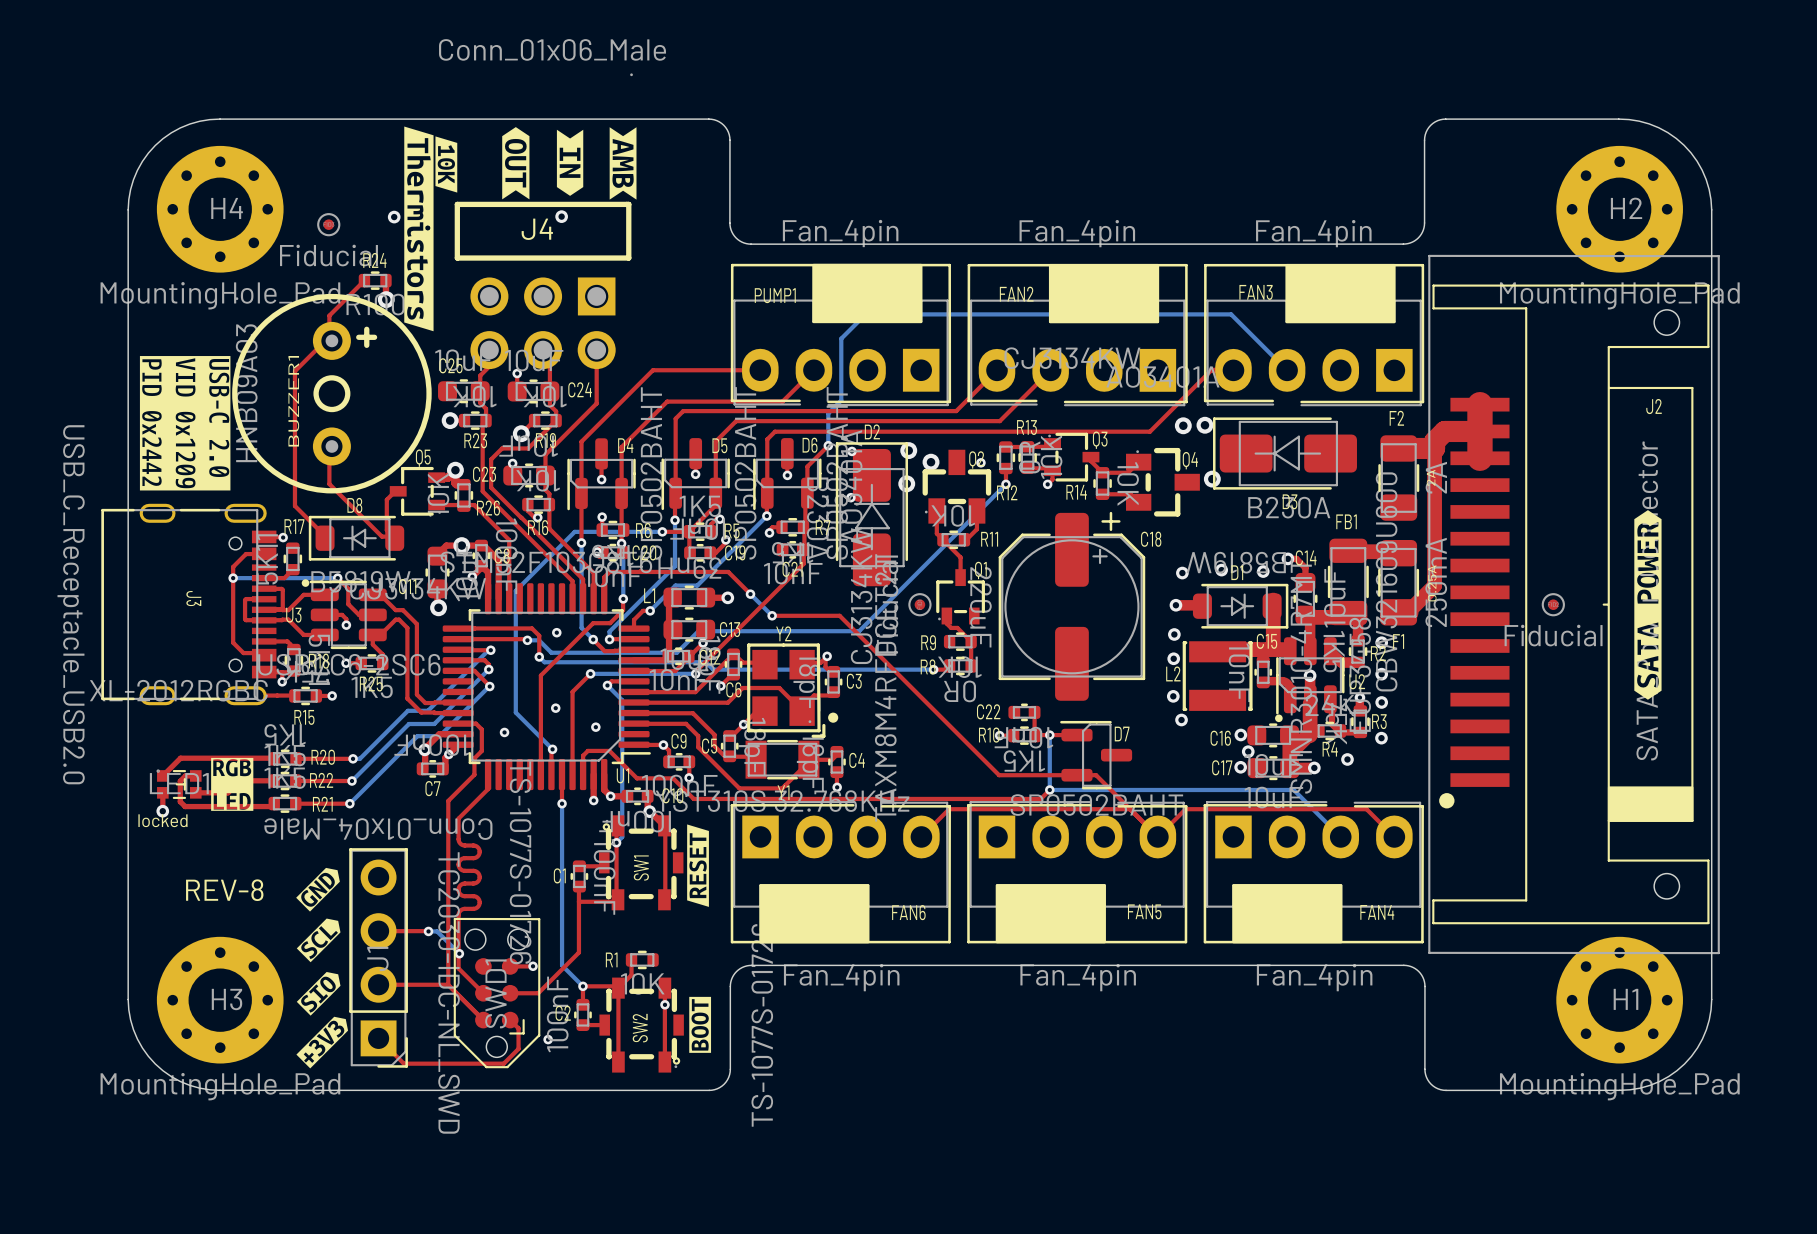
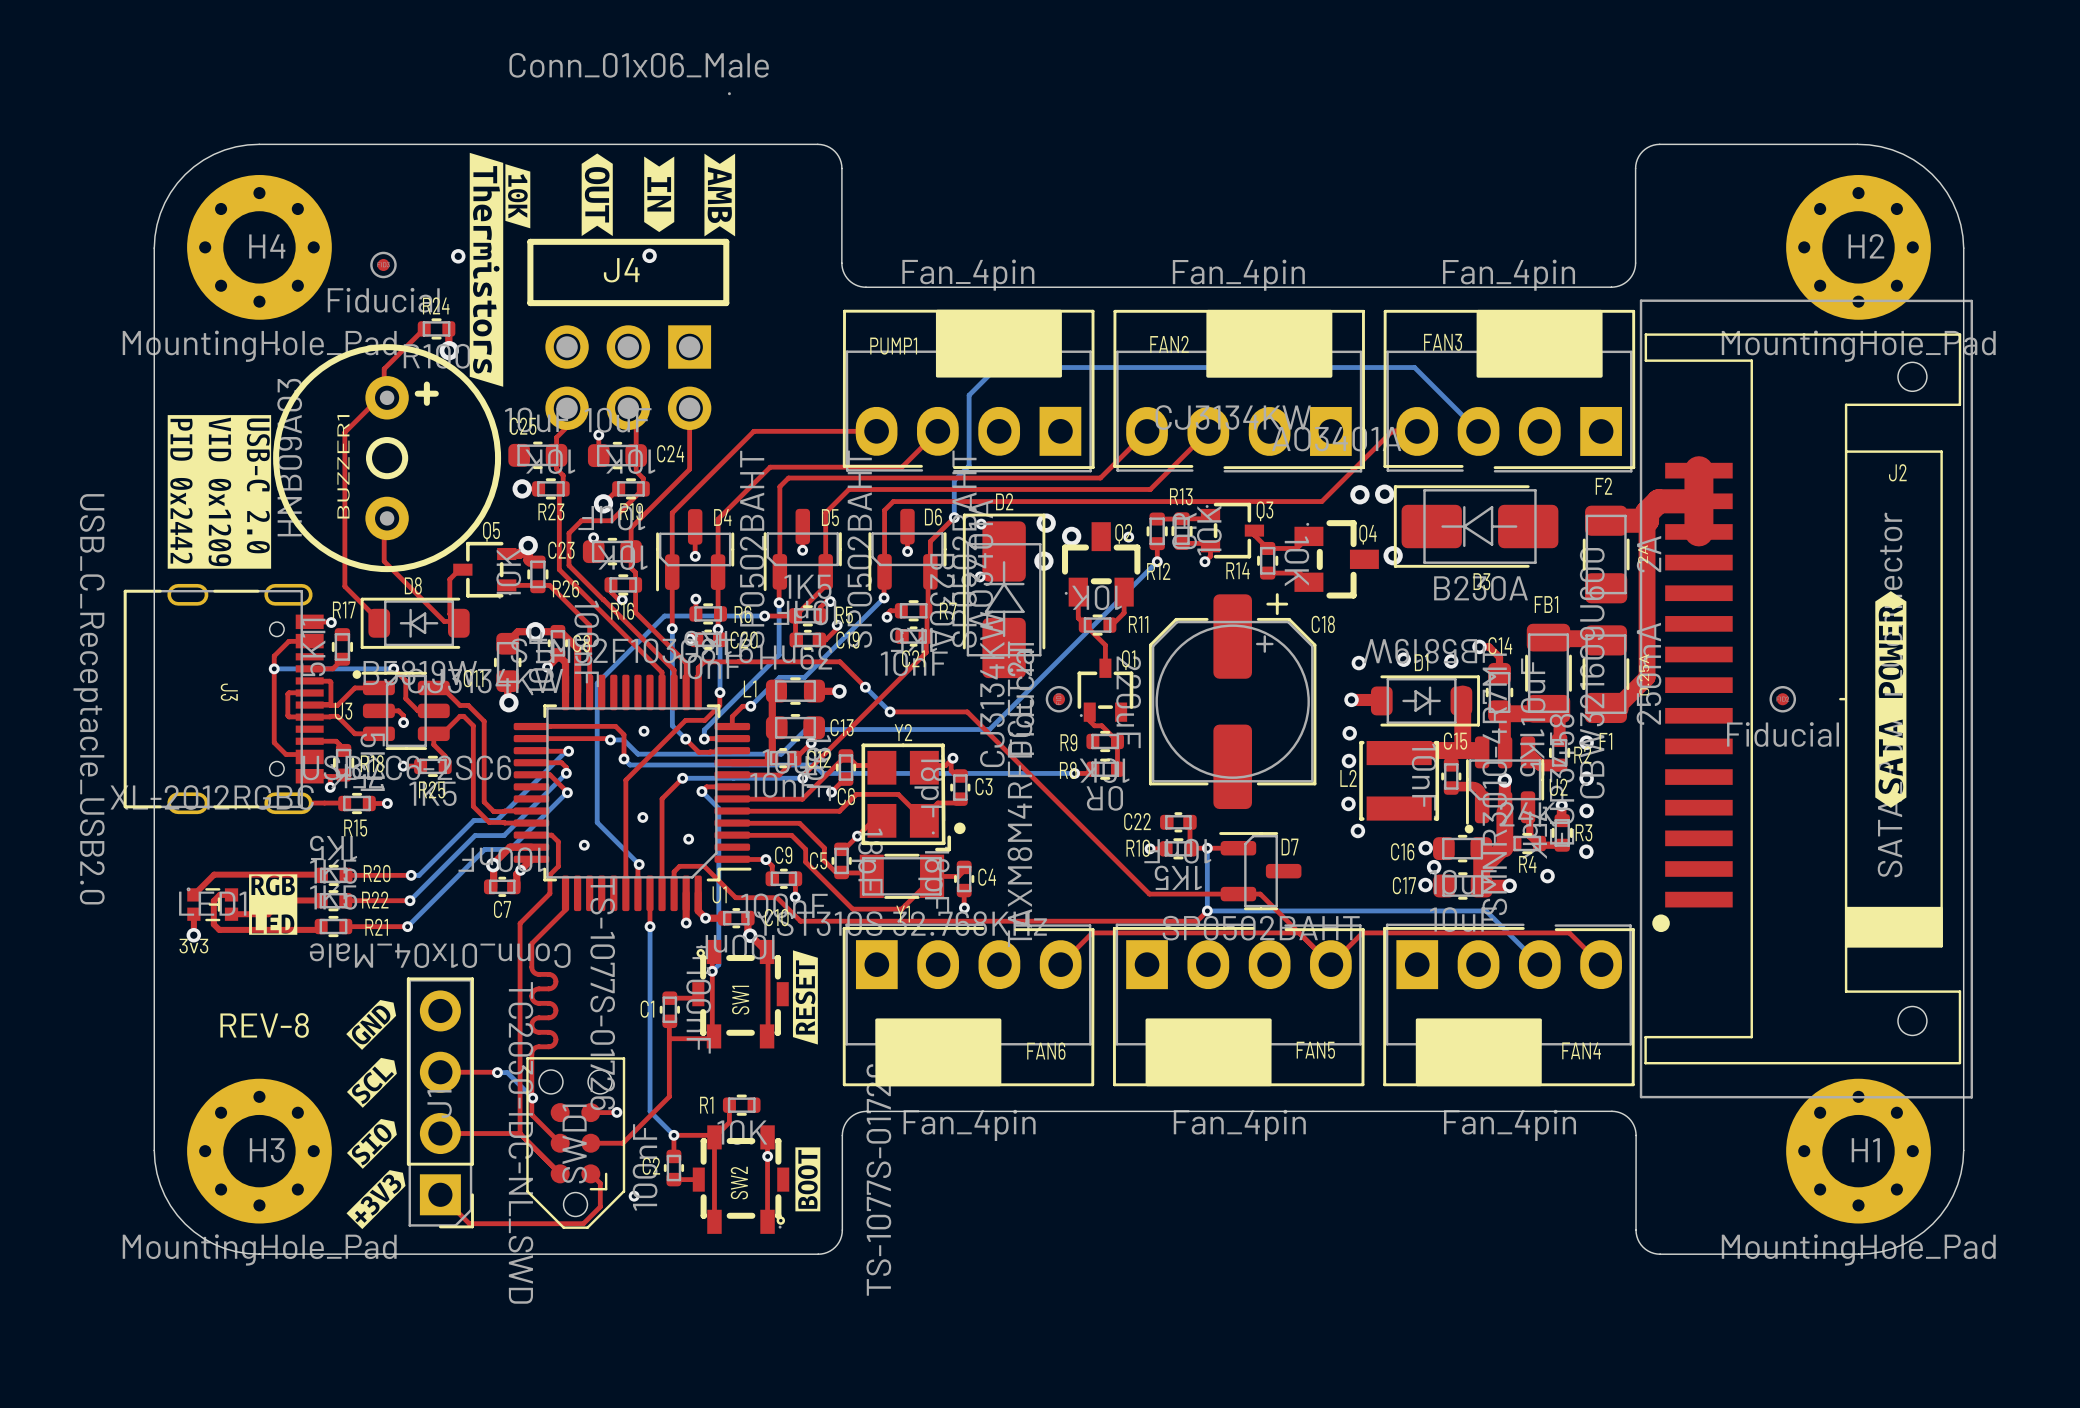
text: locked (162, 820) -> 3v3 (193, 946)

